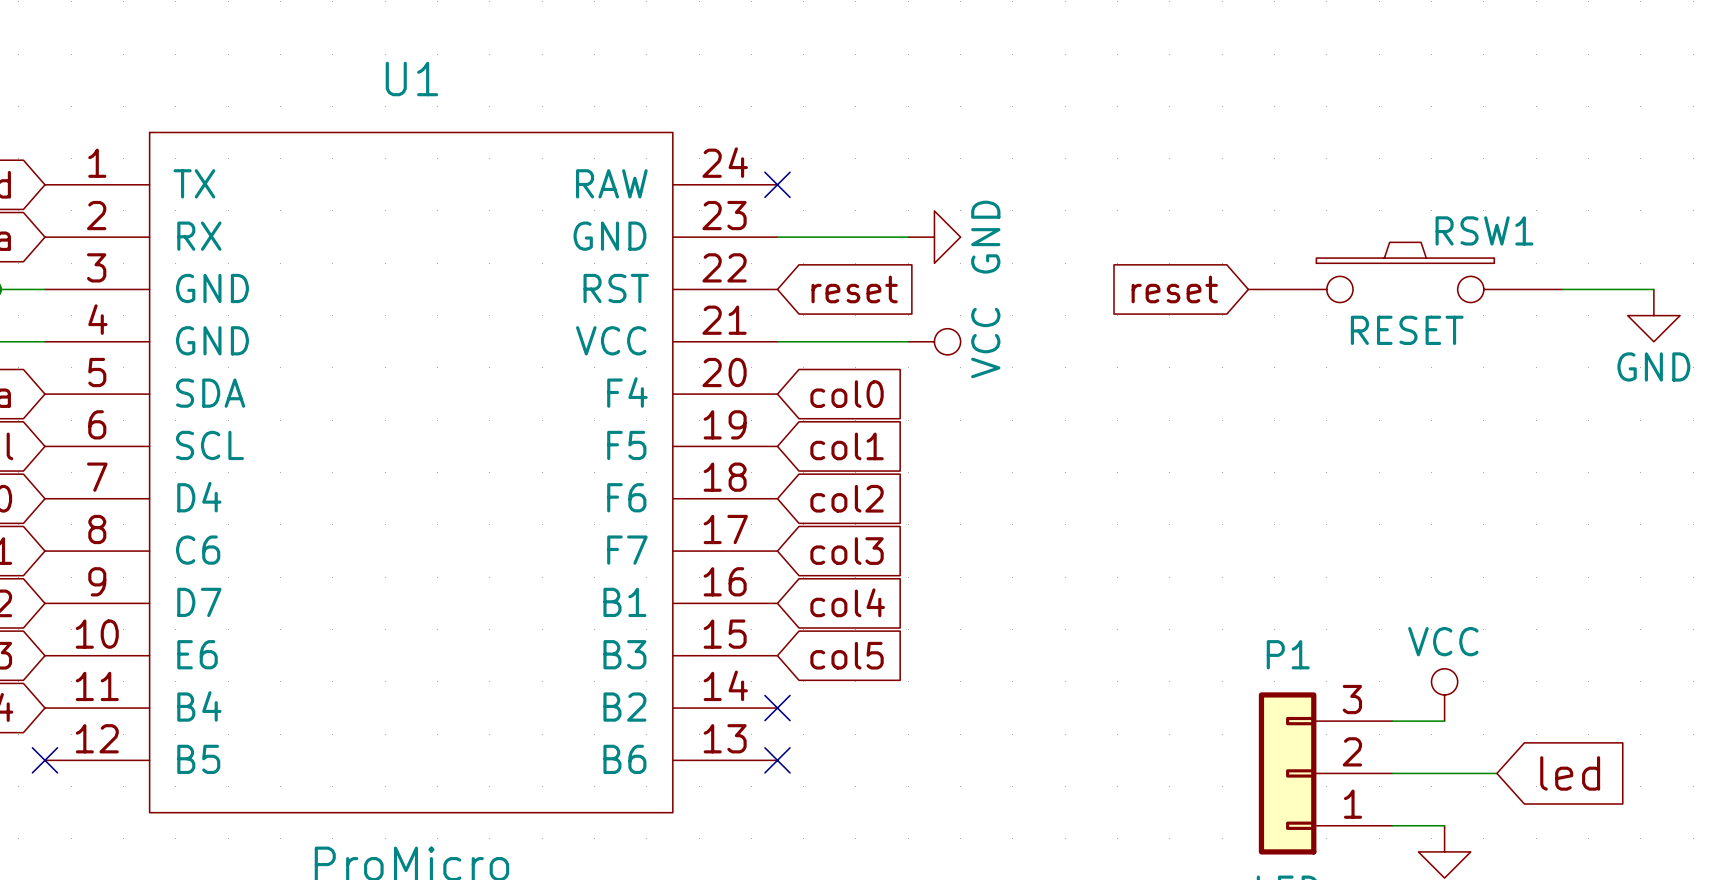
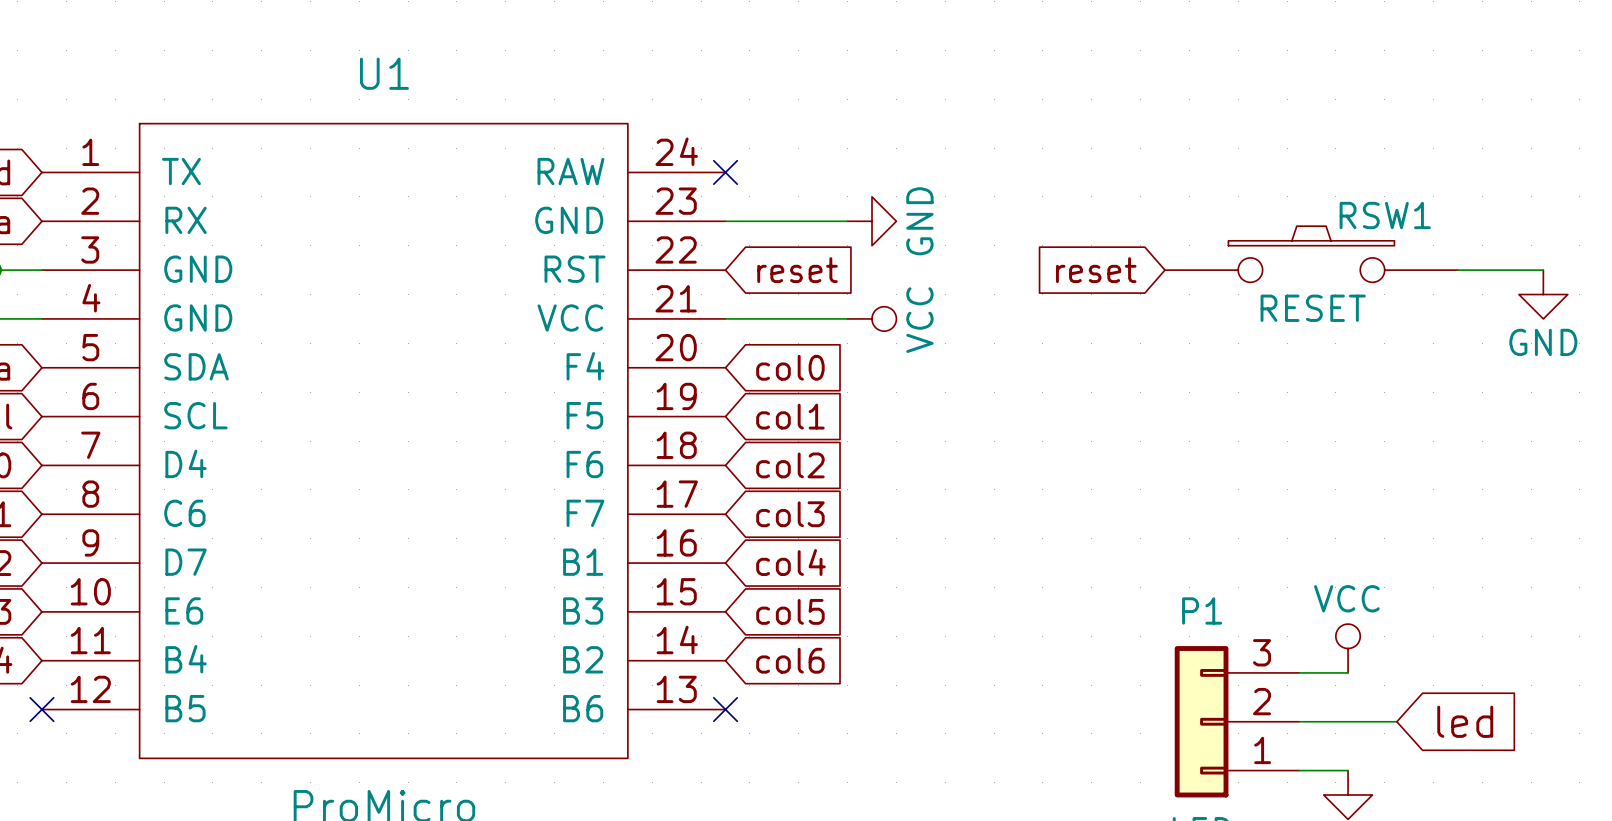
no-connect mark: (777, 708) -> none
global label: none -> col6 (790, 660)

